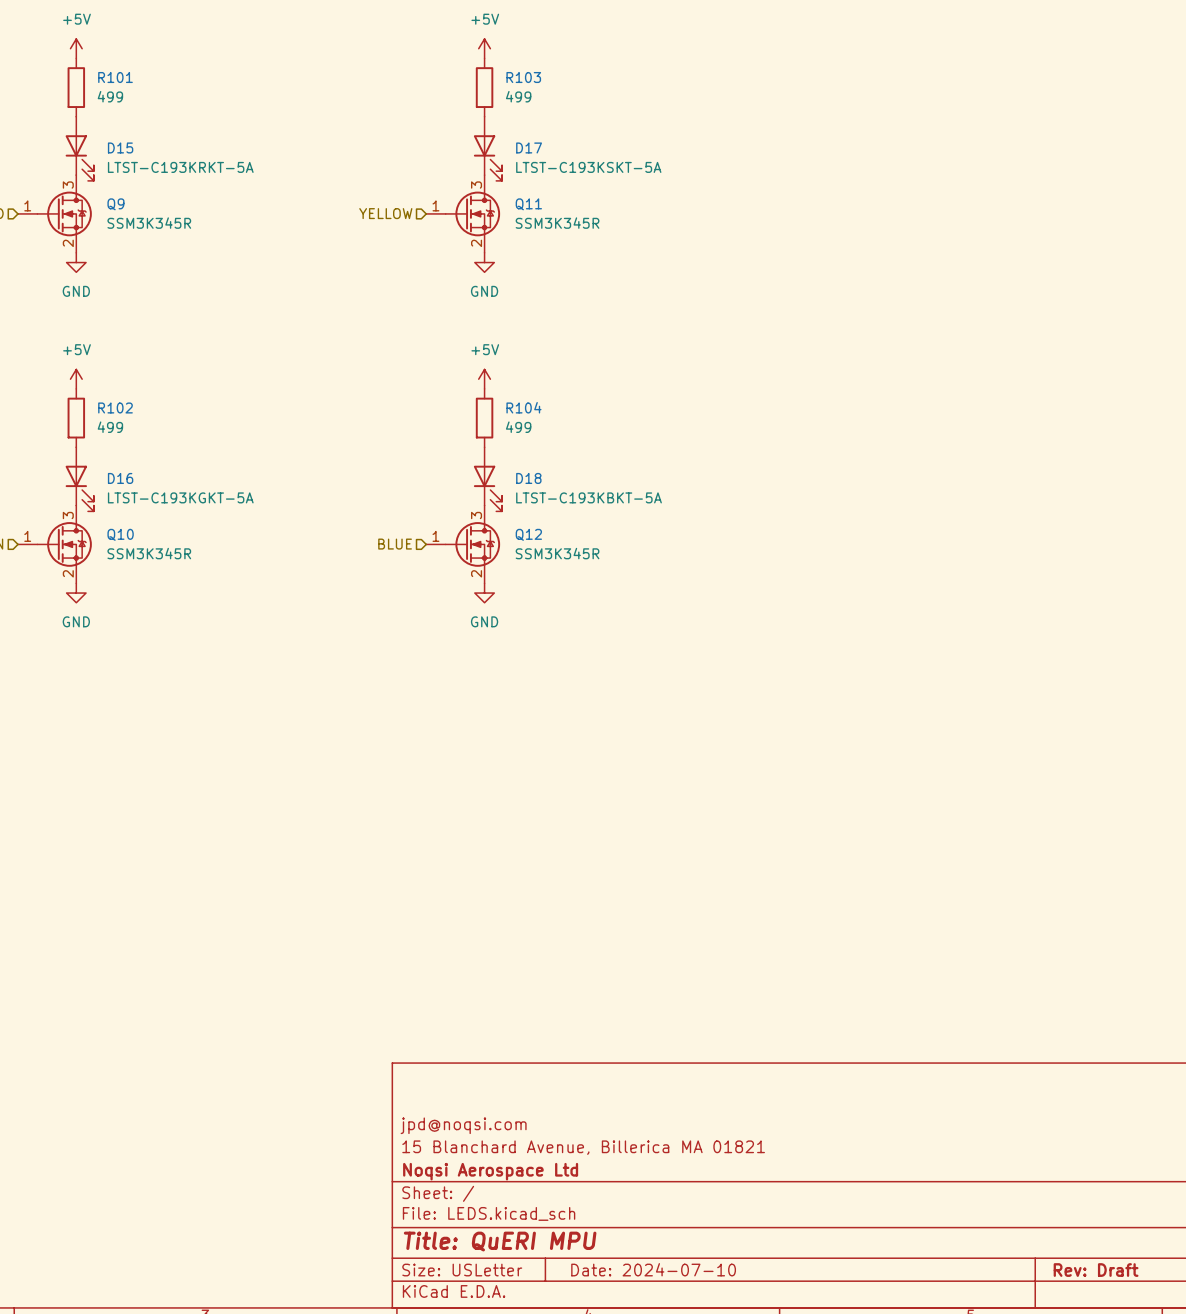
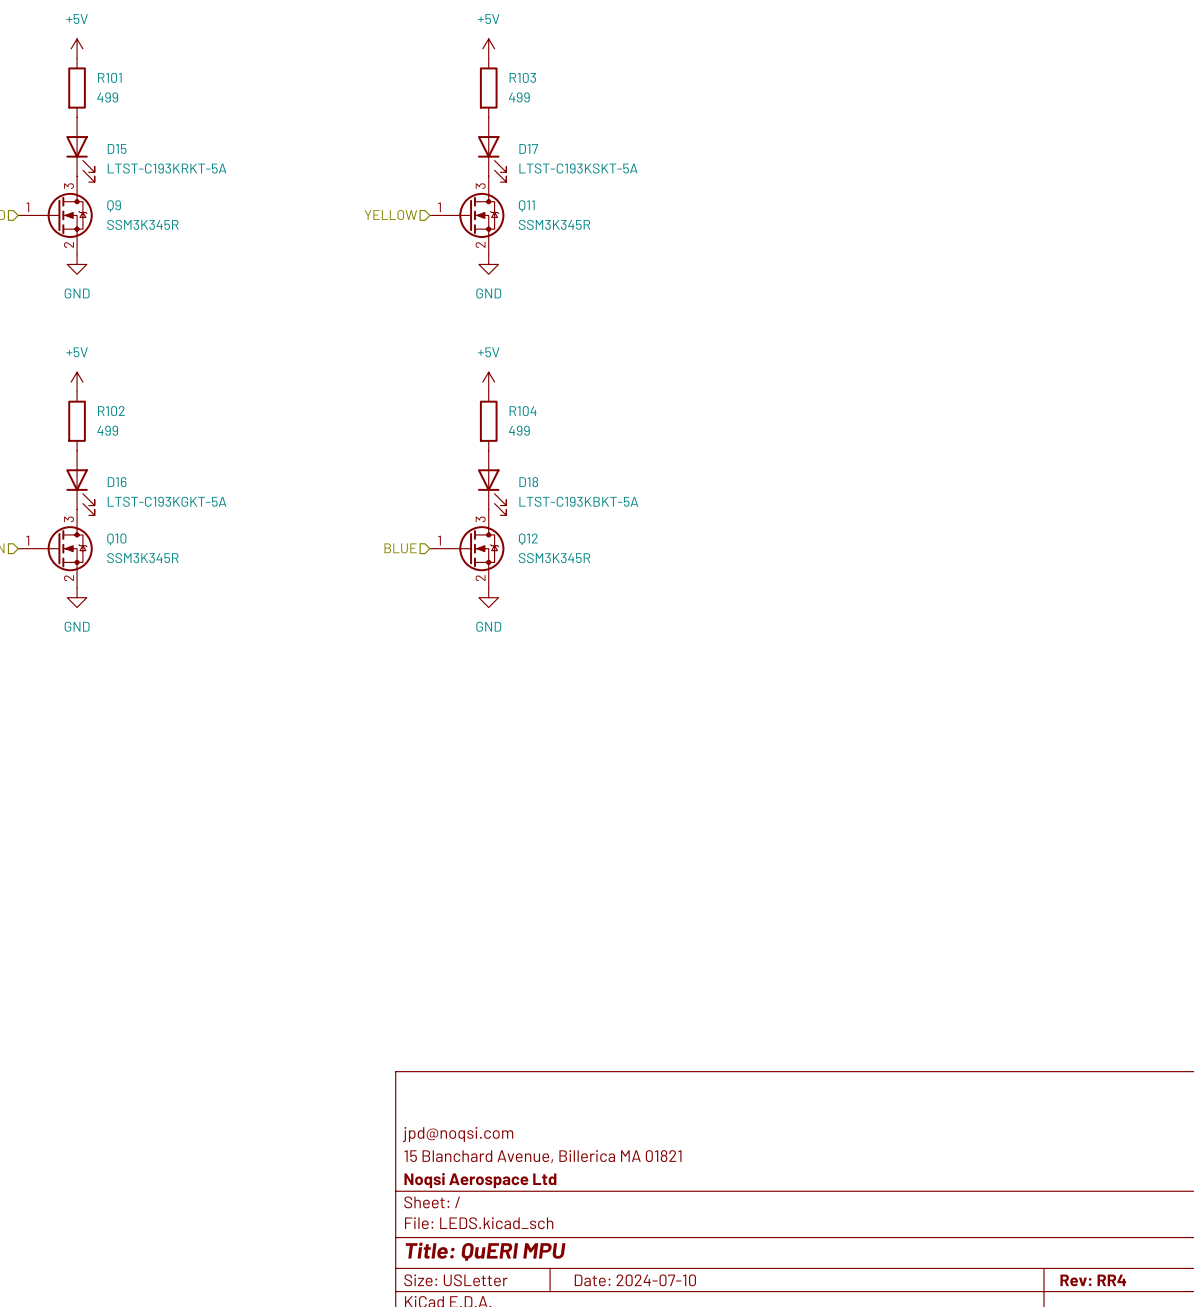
title block: Rev: Draft (1096, 1270) -> Rev: RR4 (1093, 1280)

